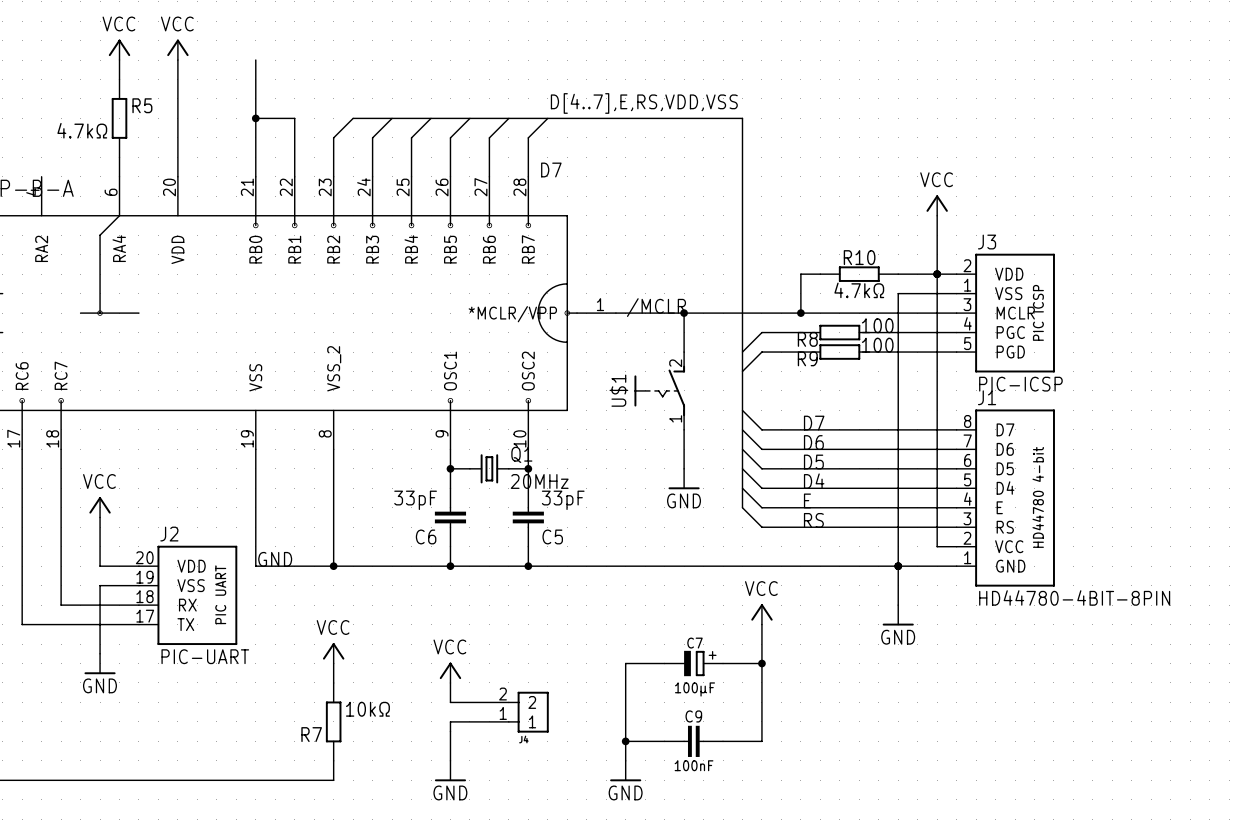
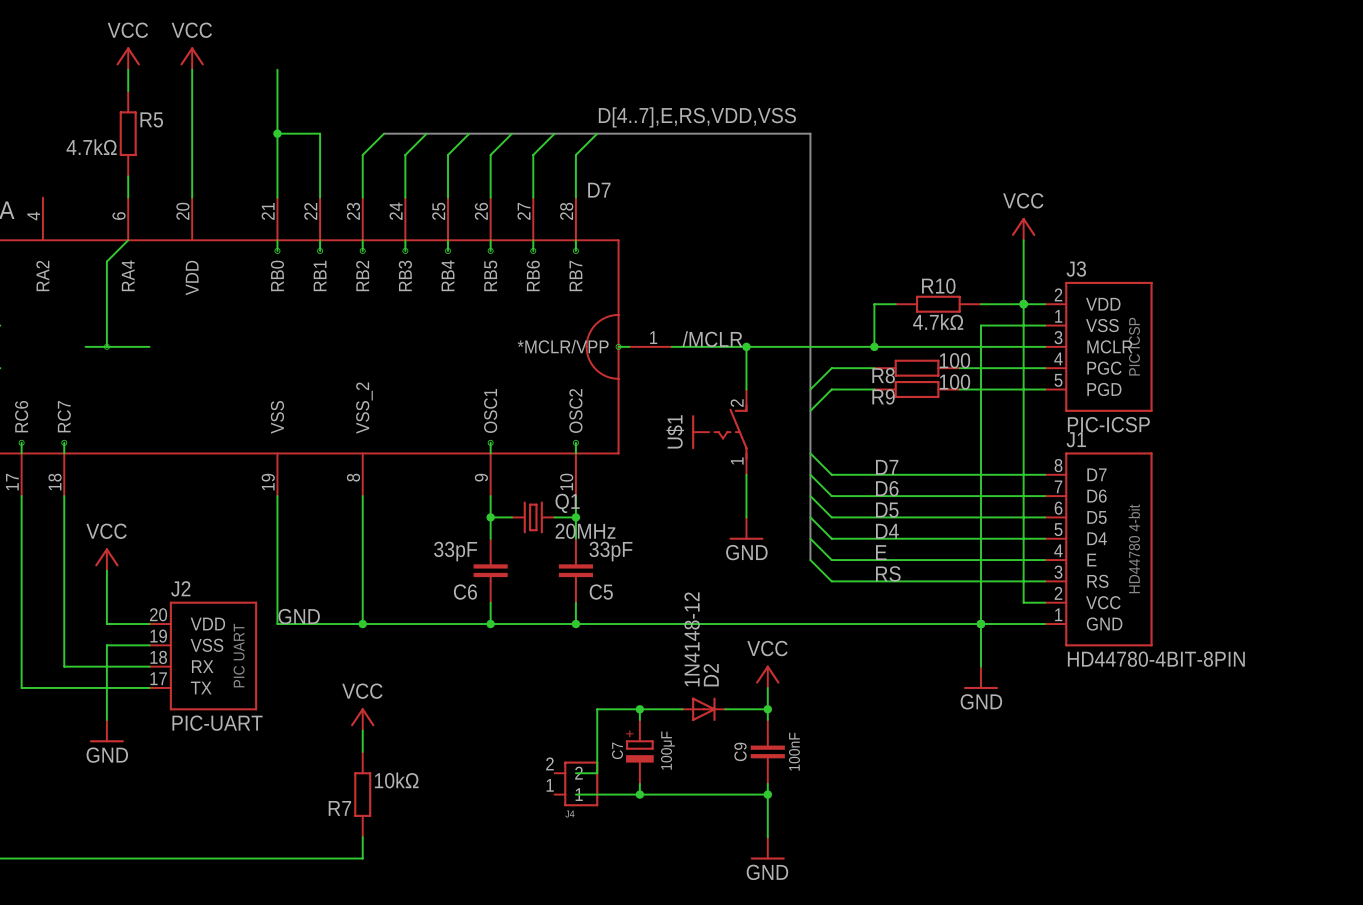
power symbol position: VCC (761, 614) -> VCC (767, 676)
wire: none -> (767, 687) (767, 719)
wire: (761, 624) (761, 741) (723, 741) -> none
wire: none -> (639, 709) (639, 719)
junction: none -> (639, 709)
wire: none -> (682, 709) (597, 709) (597, 773) (575, 773)
D2: none -> 1N4148-12 (703, 709)
junction: none -> (767, 709)
wire: (664, 663) (625, 663) (625, 760) -> none
C7 position: (693, 663) -> (639, 751)
C7 rotation: 0° (694, 663) -> 90° counterclockwise (639, 751)
wire: (723, 663) (761, 663) -> (725, 709) (767, 709)
junction: (761, 663) -> none
power symbol: VCC (450, 672) -> none
wire: (450, 682) (450, 702) (508, 702) -> none
wire: none -> (639, 783) (639, 794)
wire: none -> (767, 783) (767, 837)
C9 name position: C9 (693, 716) -> C9 (740, 751)
wire: (508, 721) (450, 721) (450, 760) -> none
wire: none -> (575, 794) (767, 794)
junction: none -> (639, 794)
junction: none -> (767, 794)
wire: (625, 741) (664, 741) -> none
junction: (625, 741) -> none
C9 rotation: 0° (693, 741) -> 90° clockwise (767, 751)
C9 position: (693, 741) -> (767, 751)
C9 value position: 100nF (694, 765) -> 100nF (794, 751)
power symbol: GND (450, 771) -> none
power symbol position: GND (625, 771) -> GND (767, 848)
power symbol text position: GND (625, 792) -> GND (767, 872)

